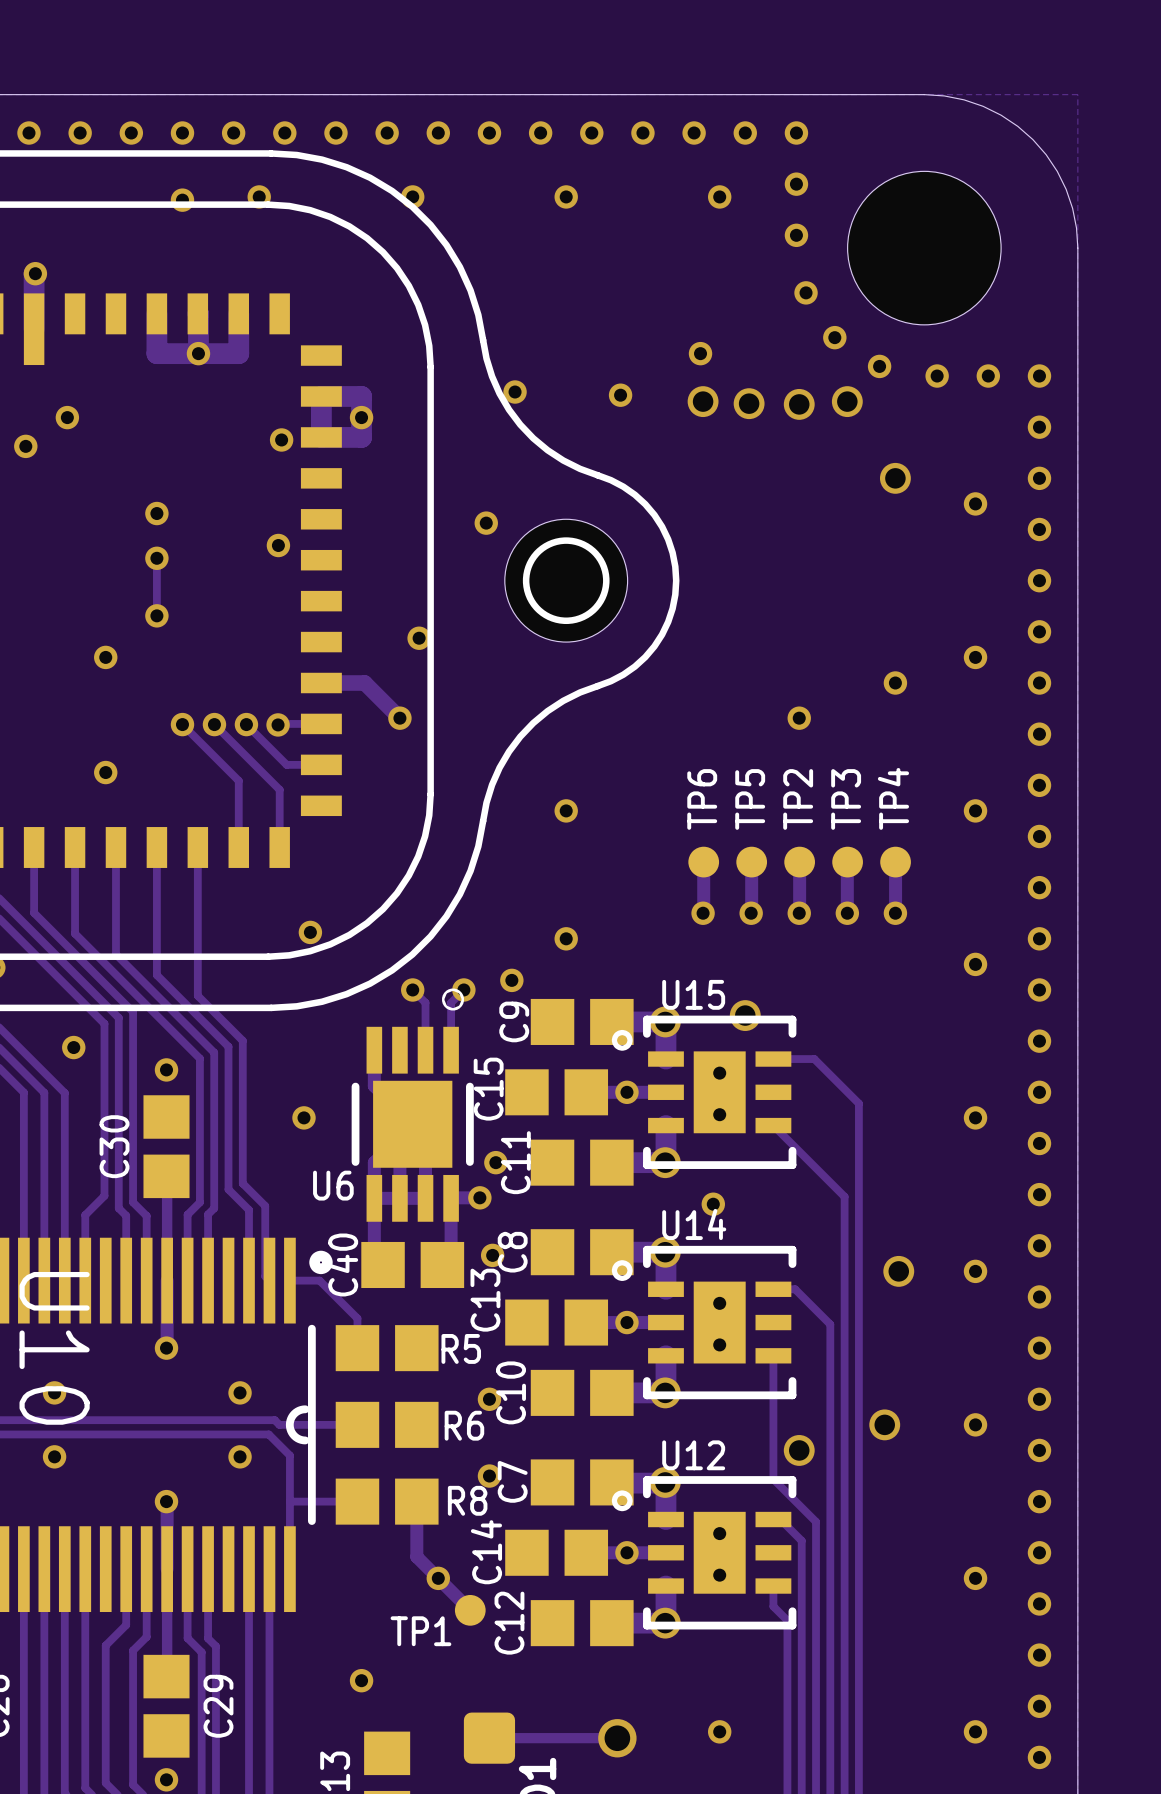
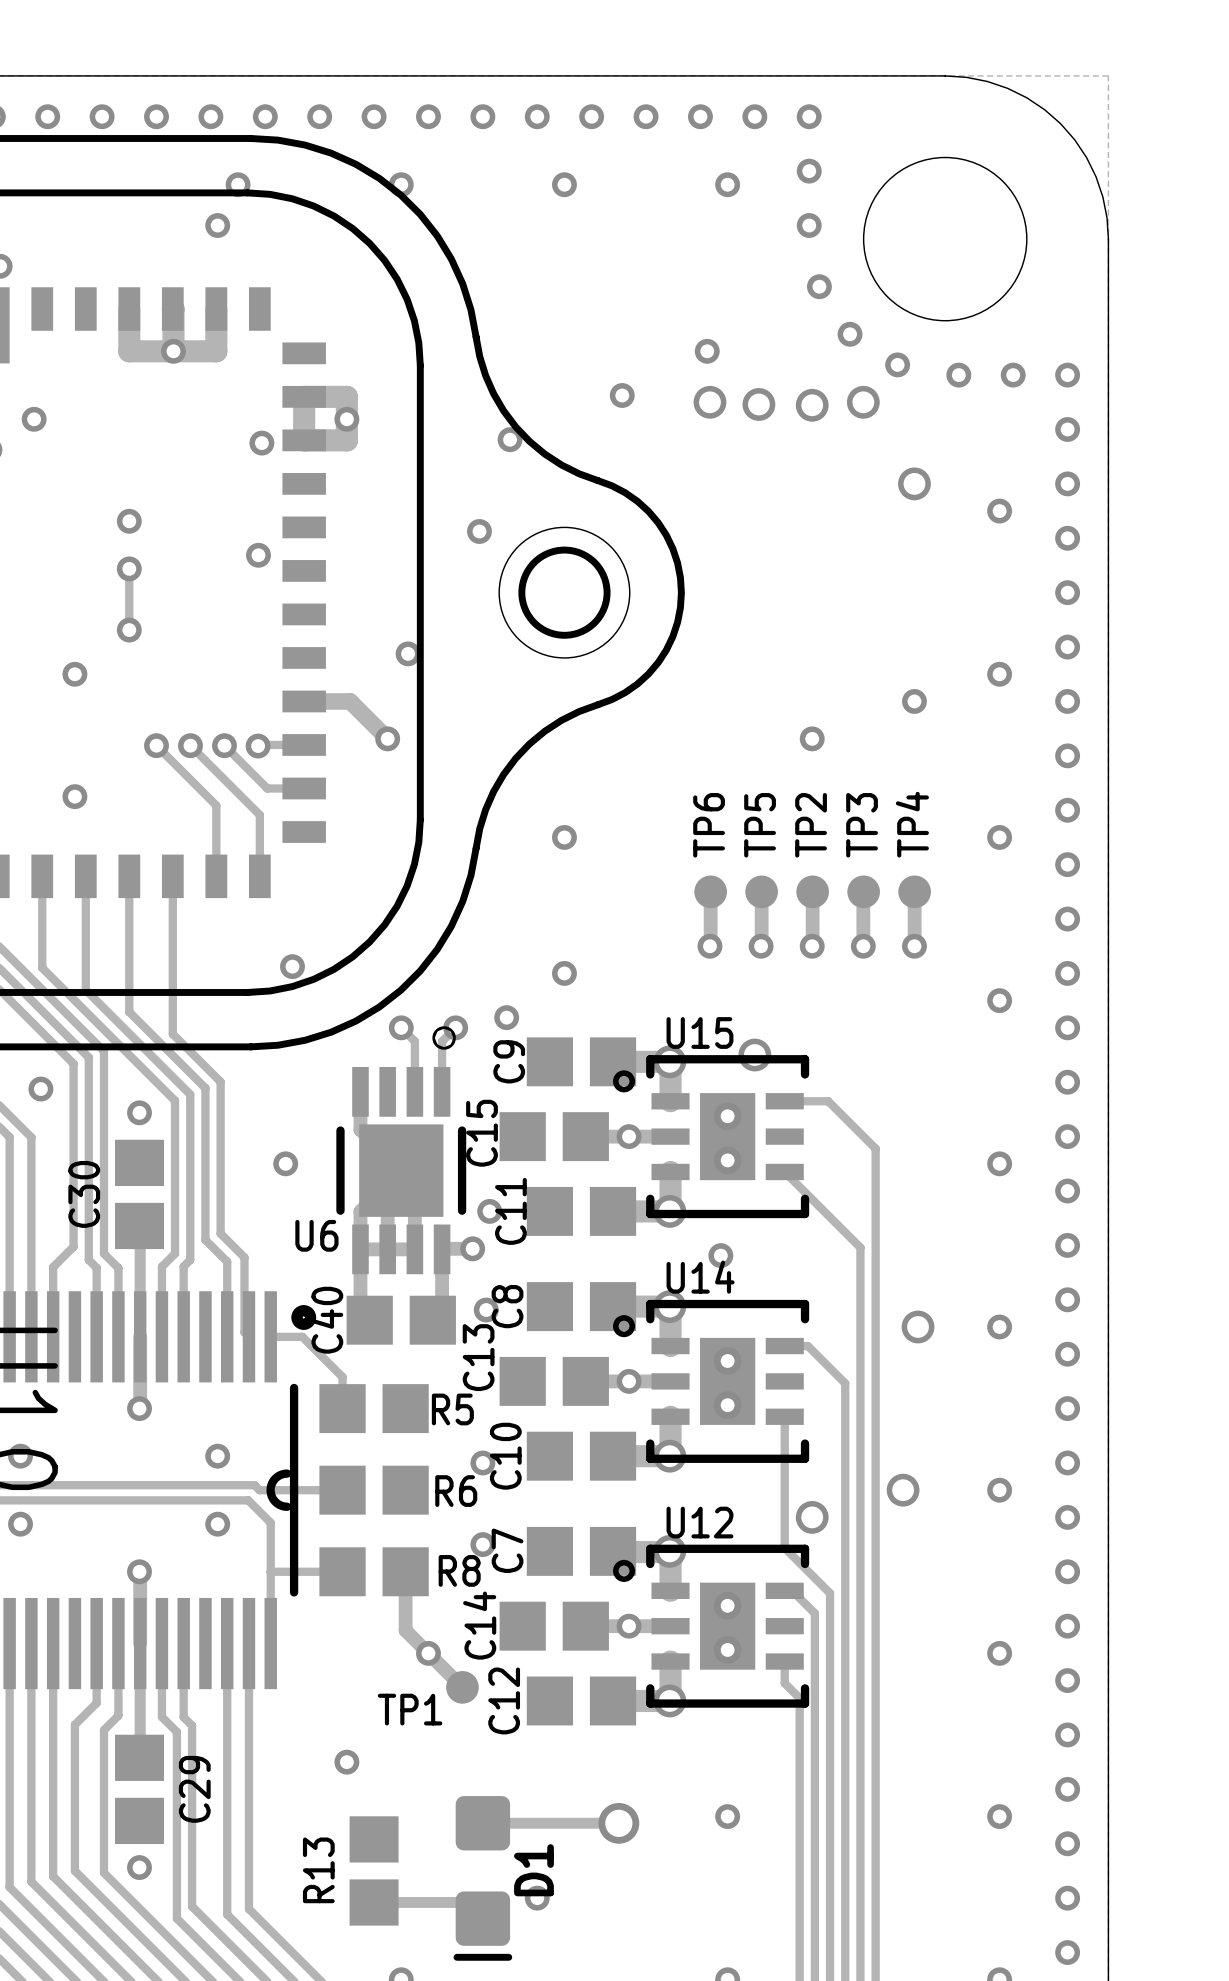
via position: (182, 200) -> (217, 225)
via position: (515, 392) -> (510, 439)

